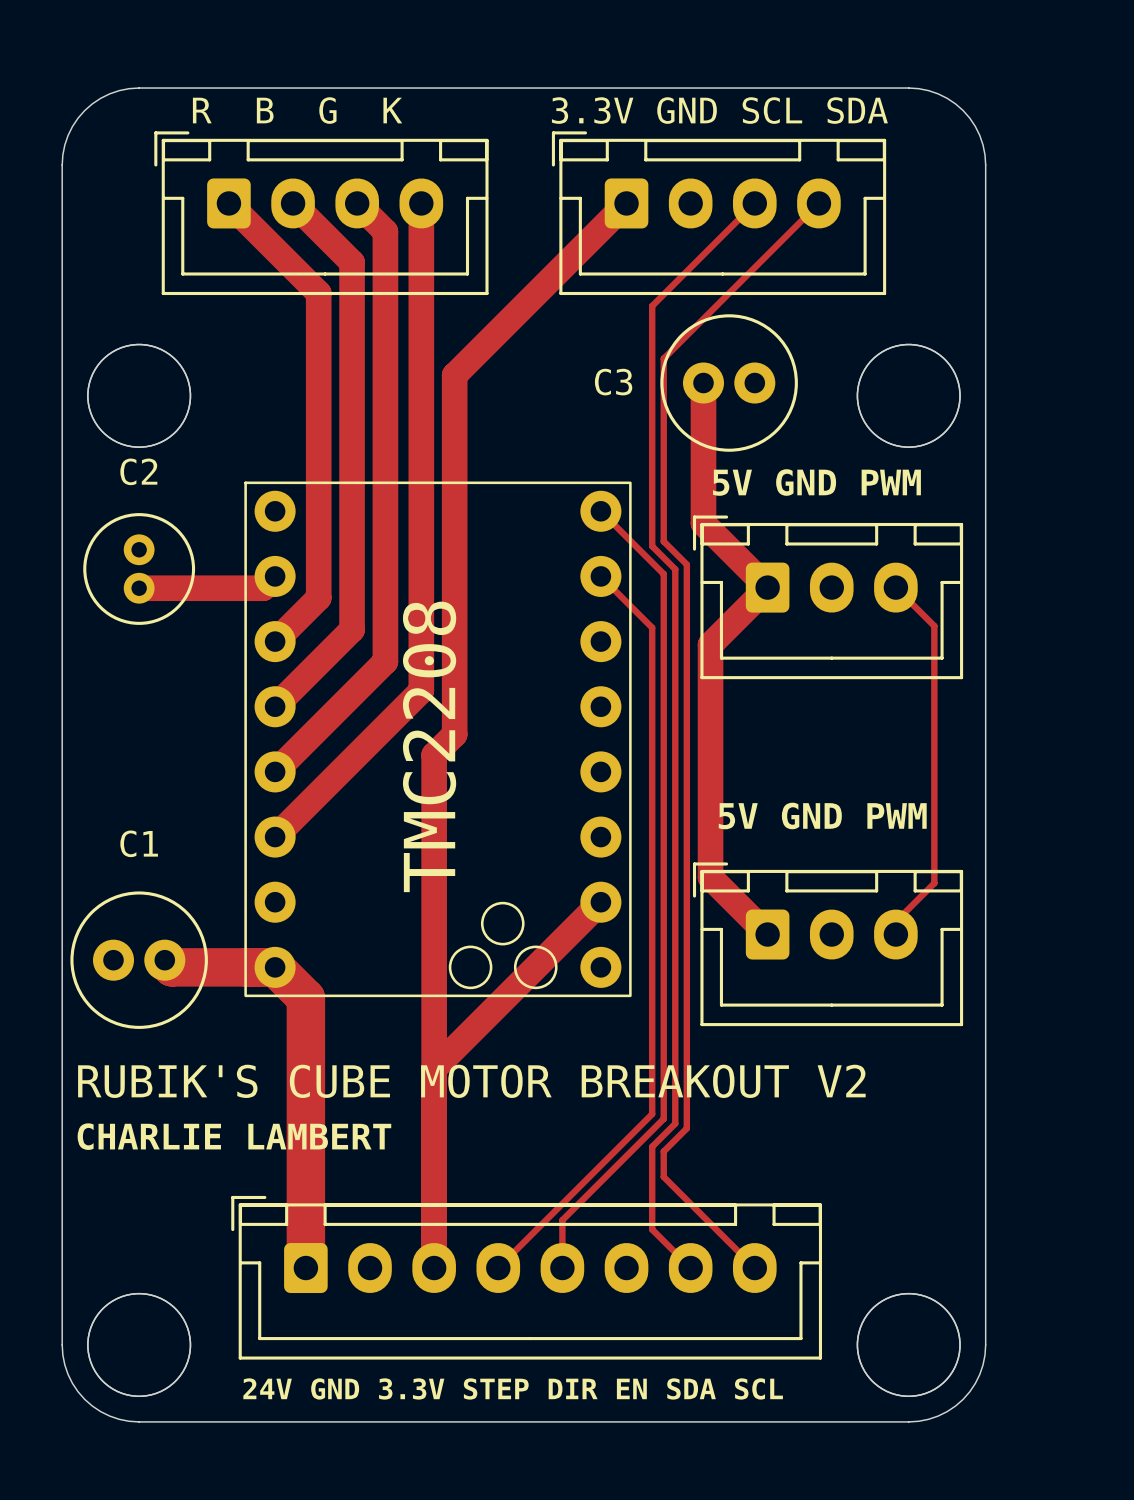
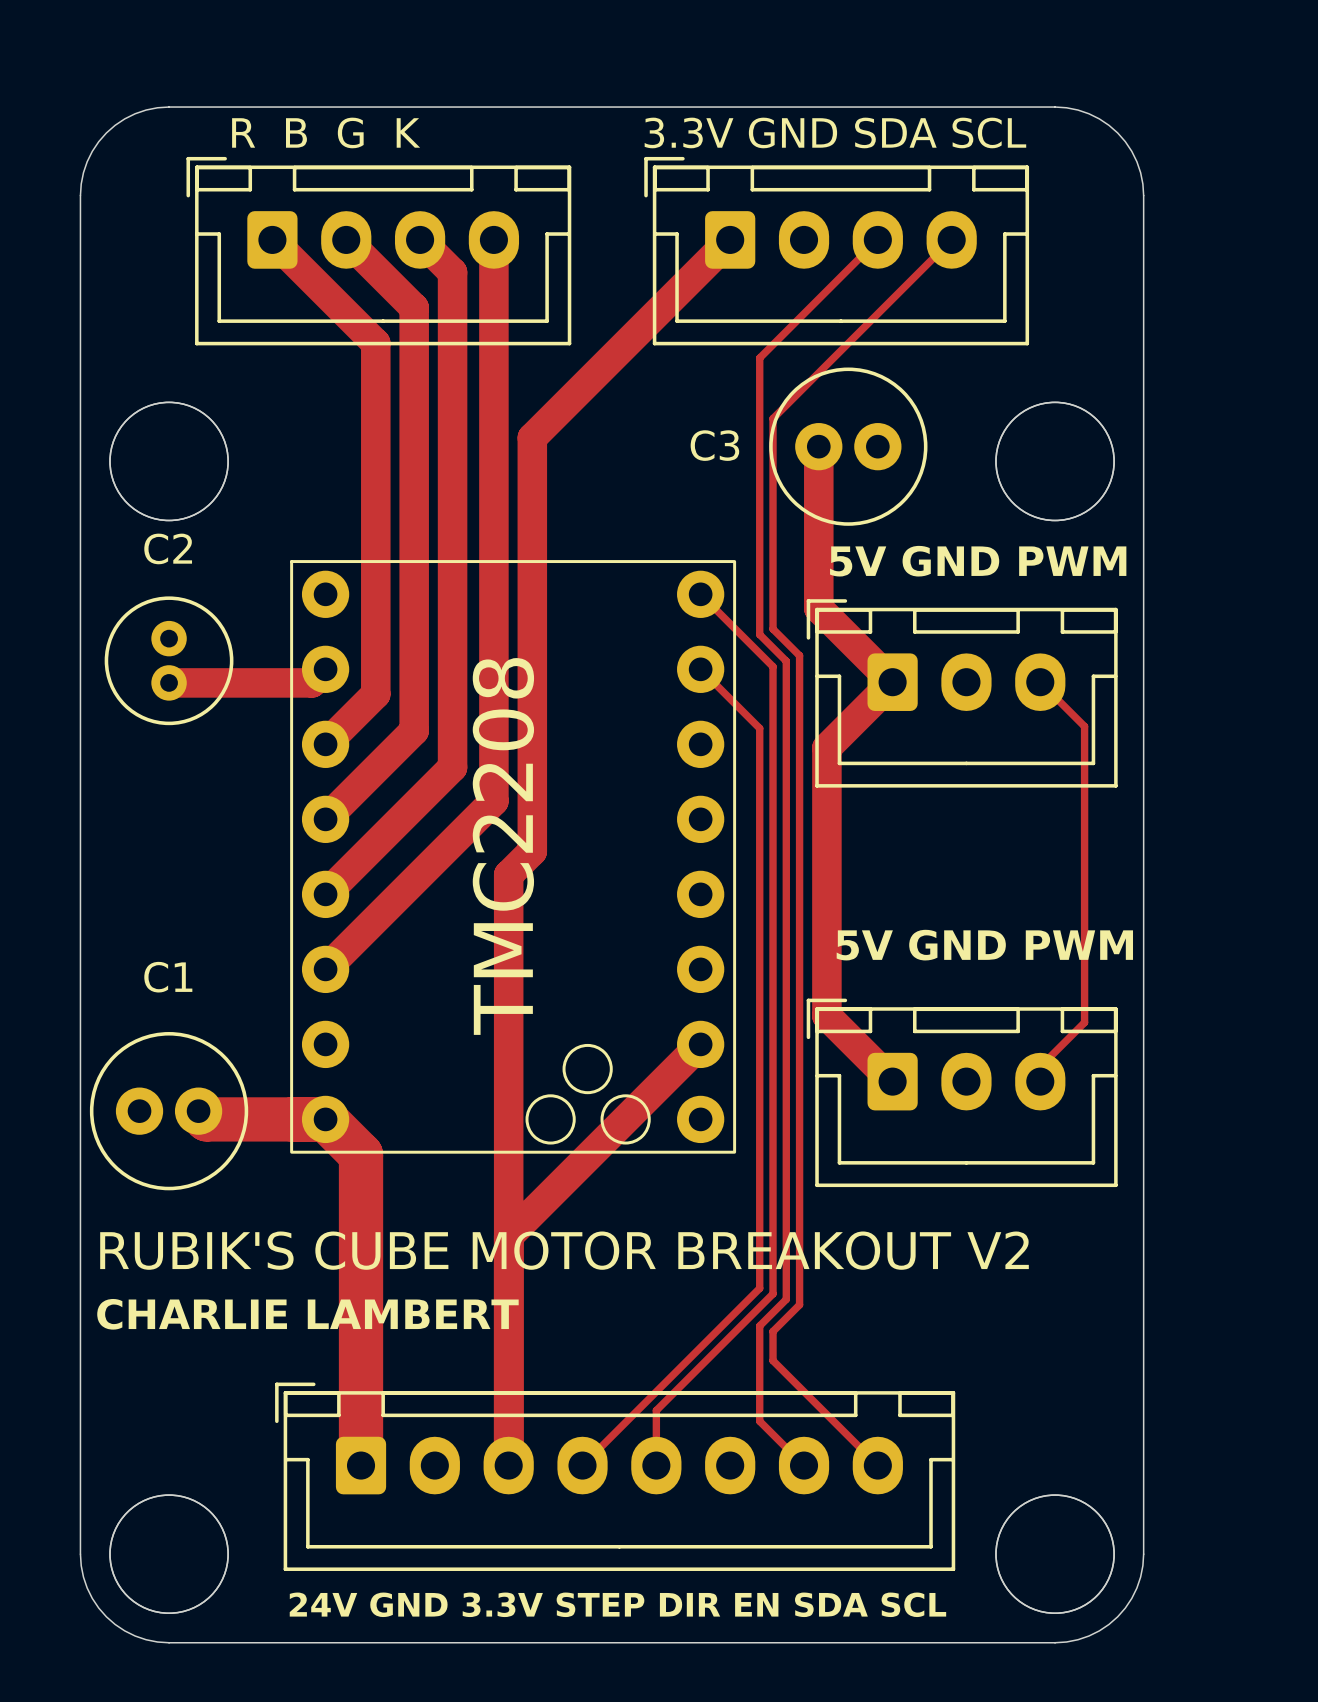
text: 3.3V GND SCL SDA (719, 110) -> 3.3V GND SDA SCL (835, 132)

